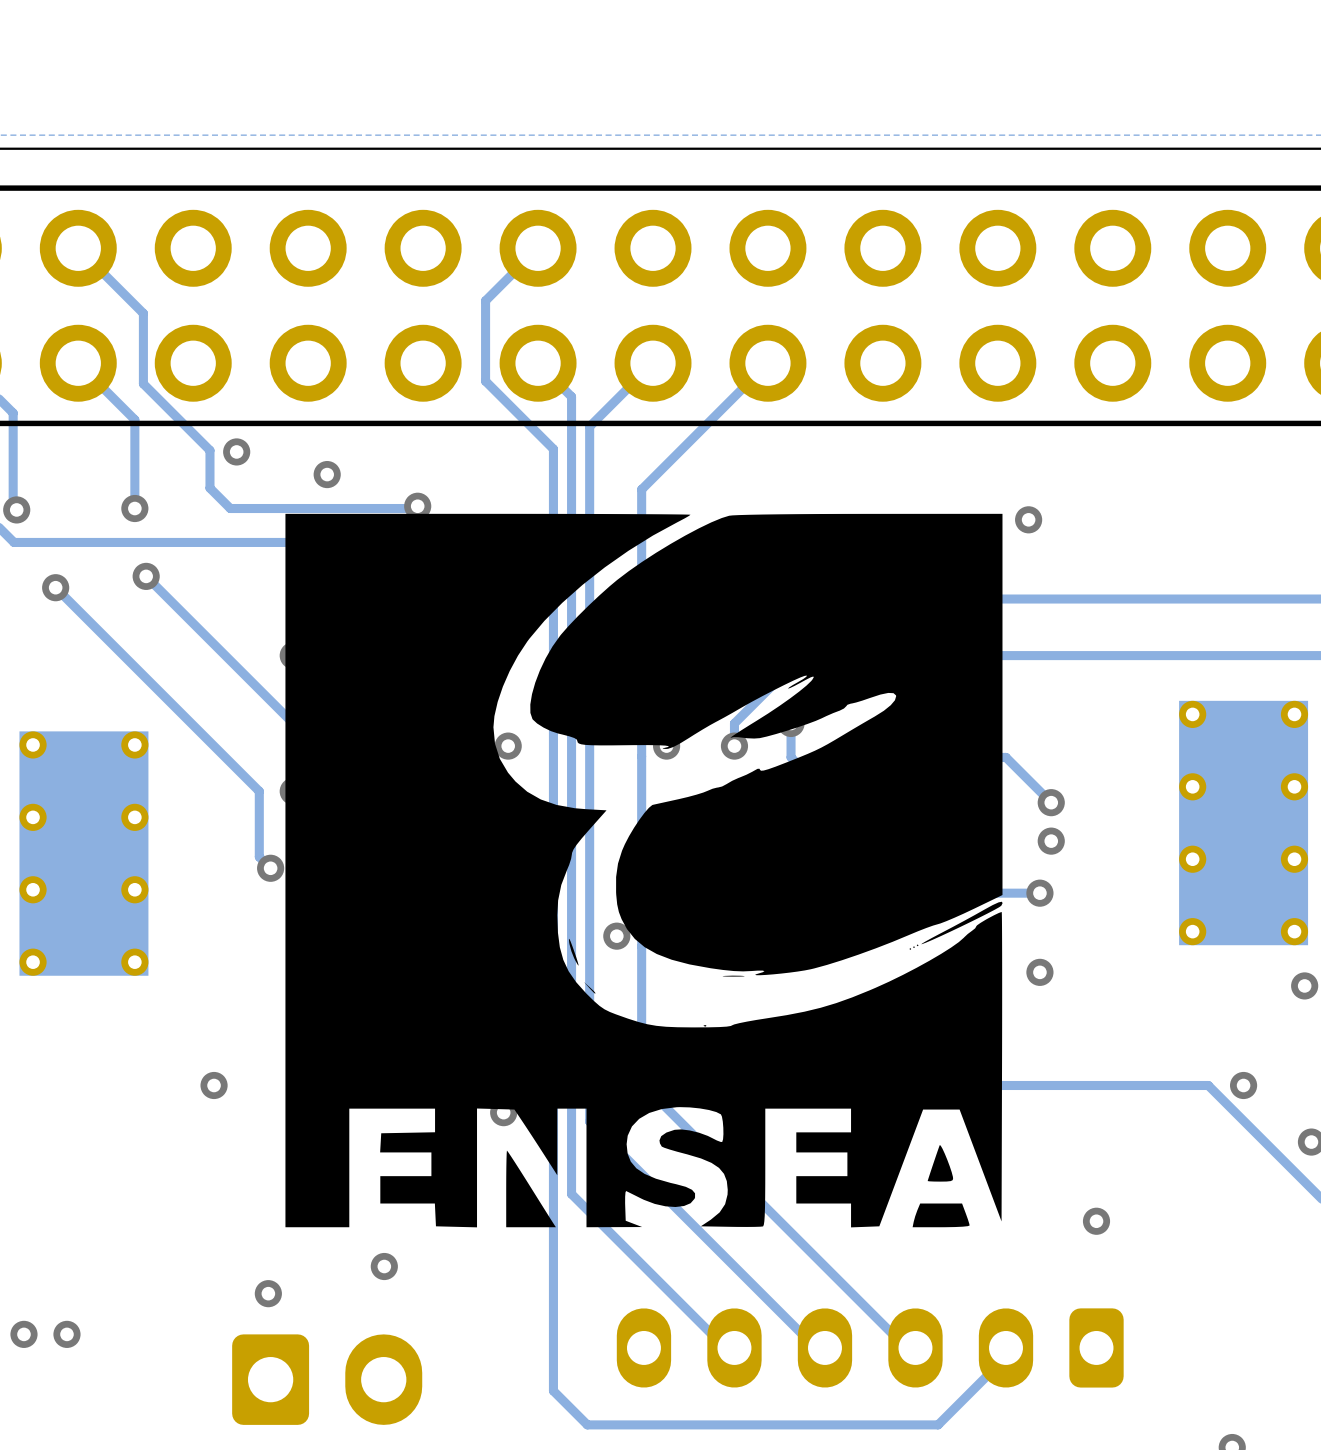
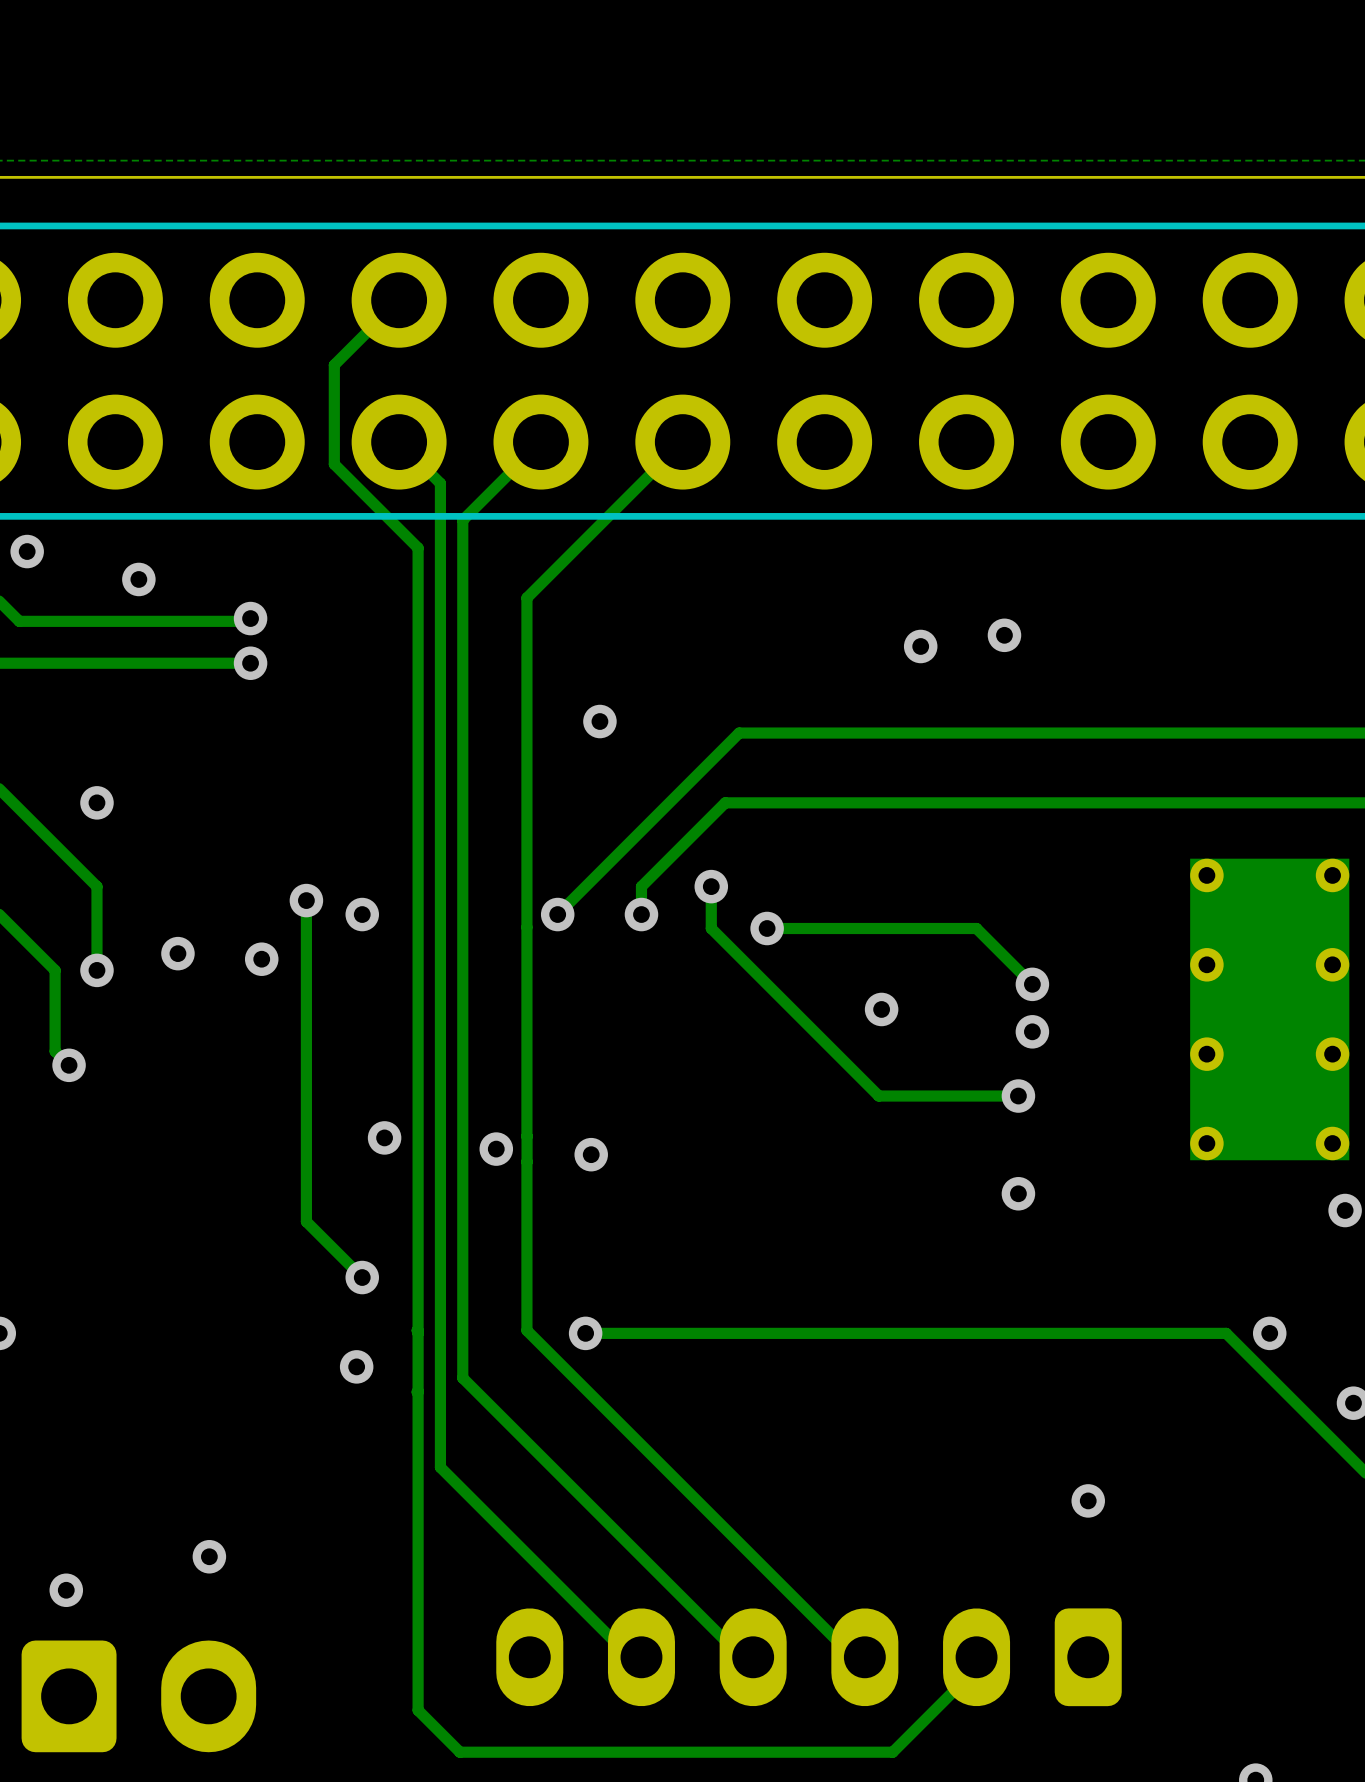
drawing: [285, 513, 1003, 1228] -> none

